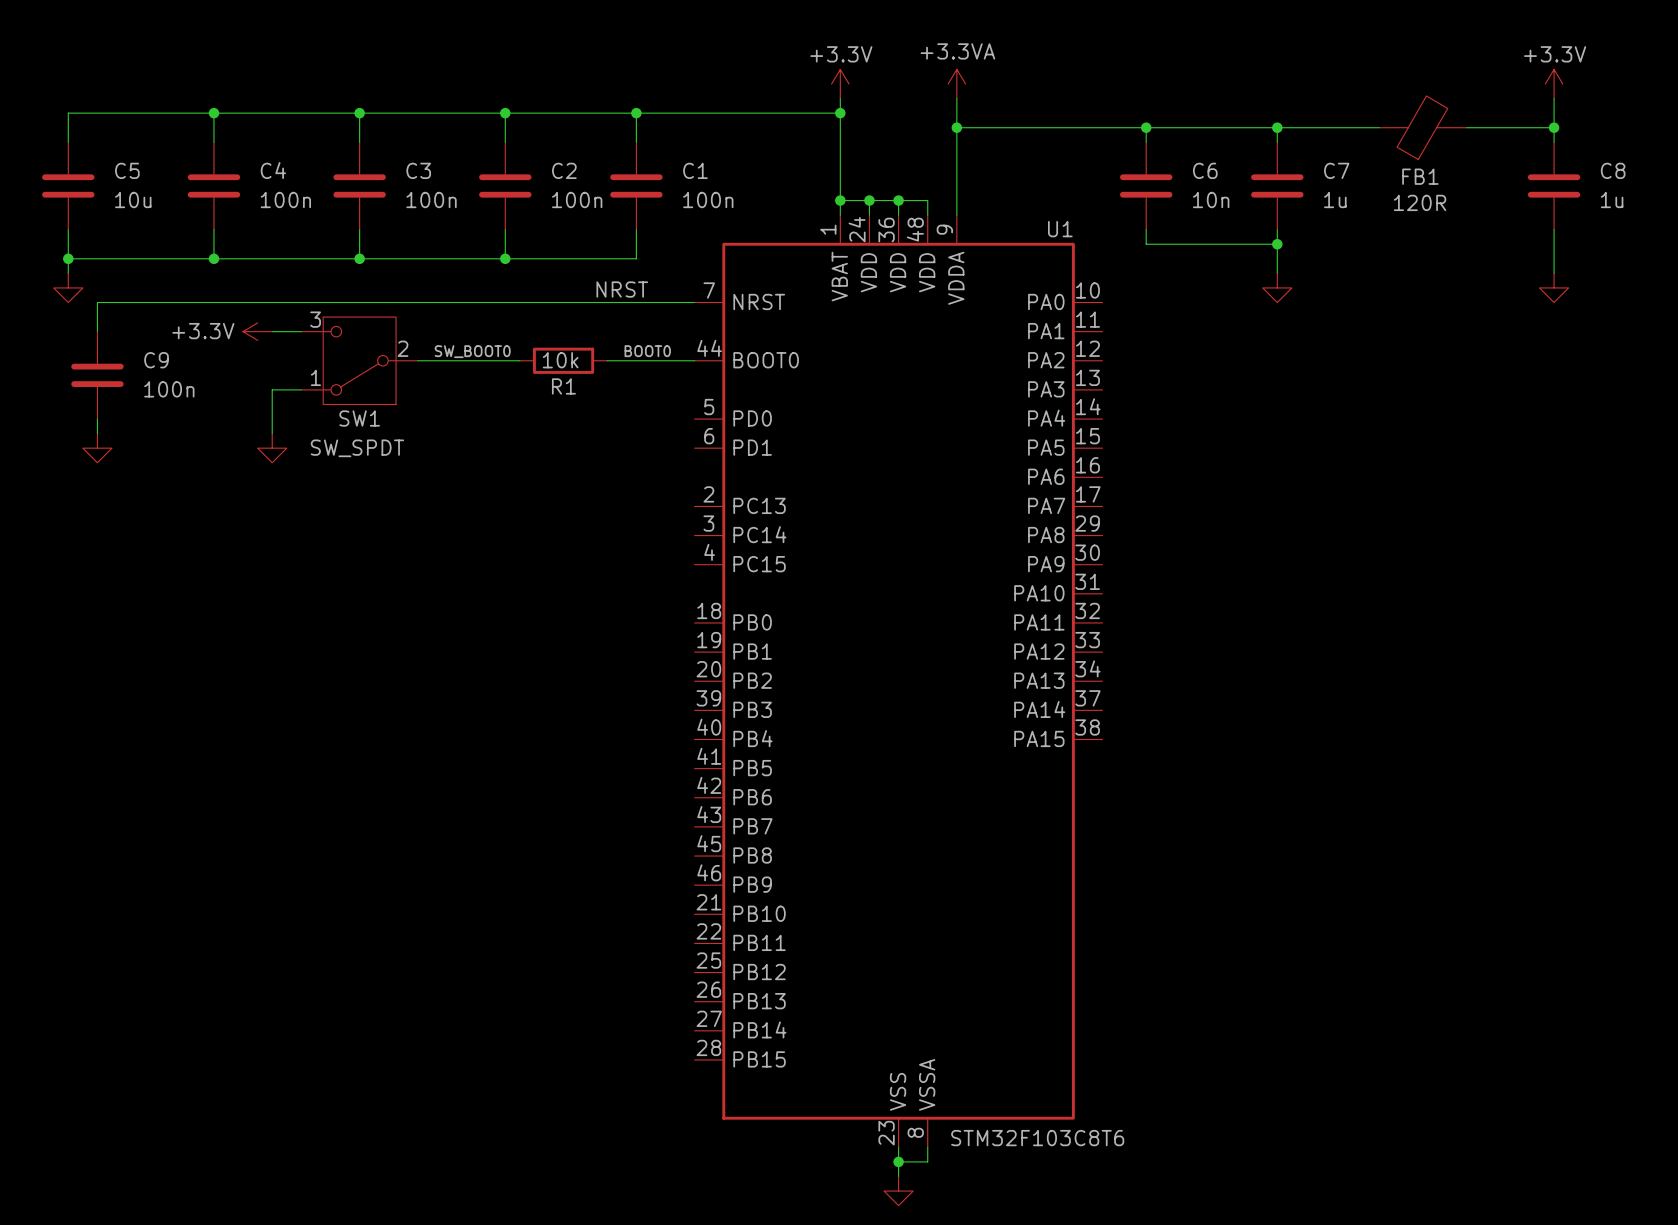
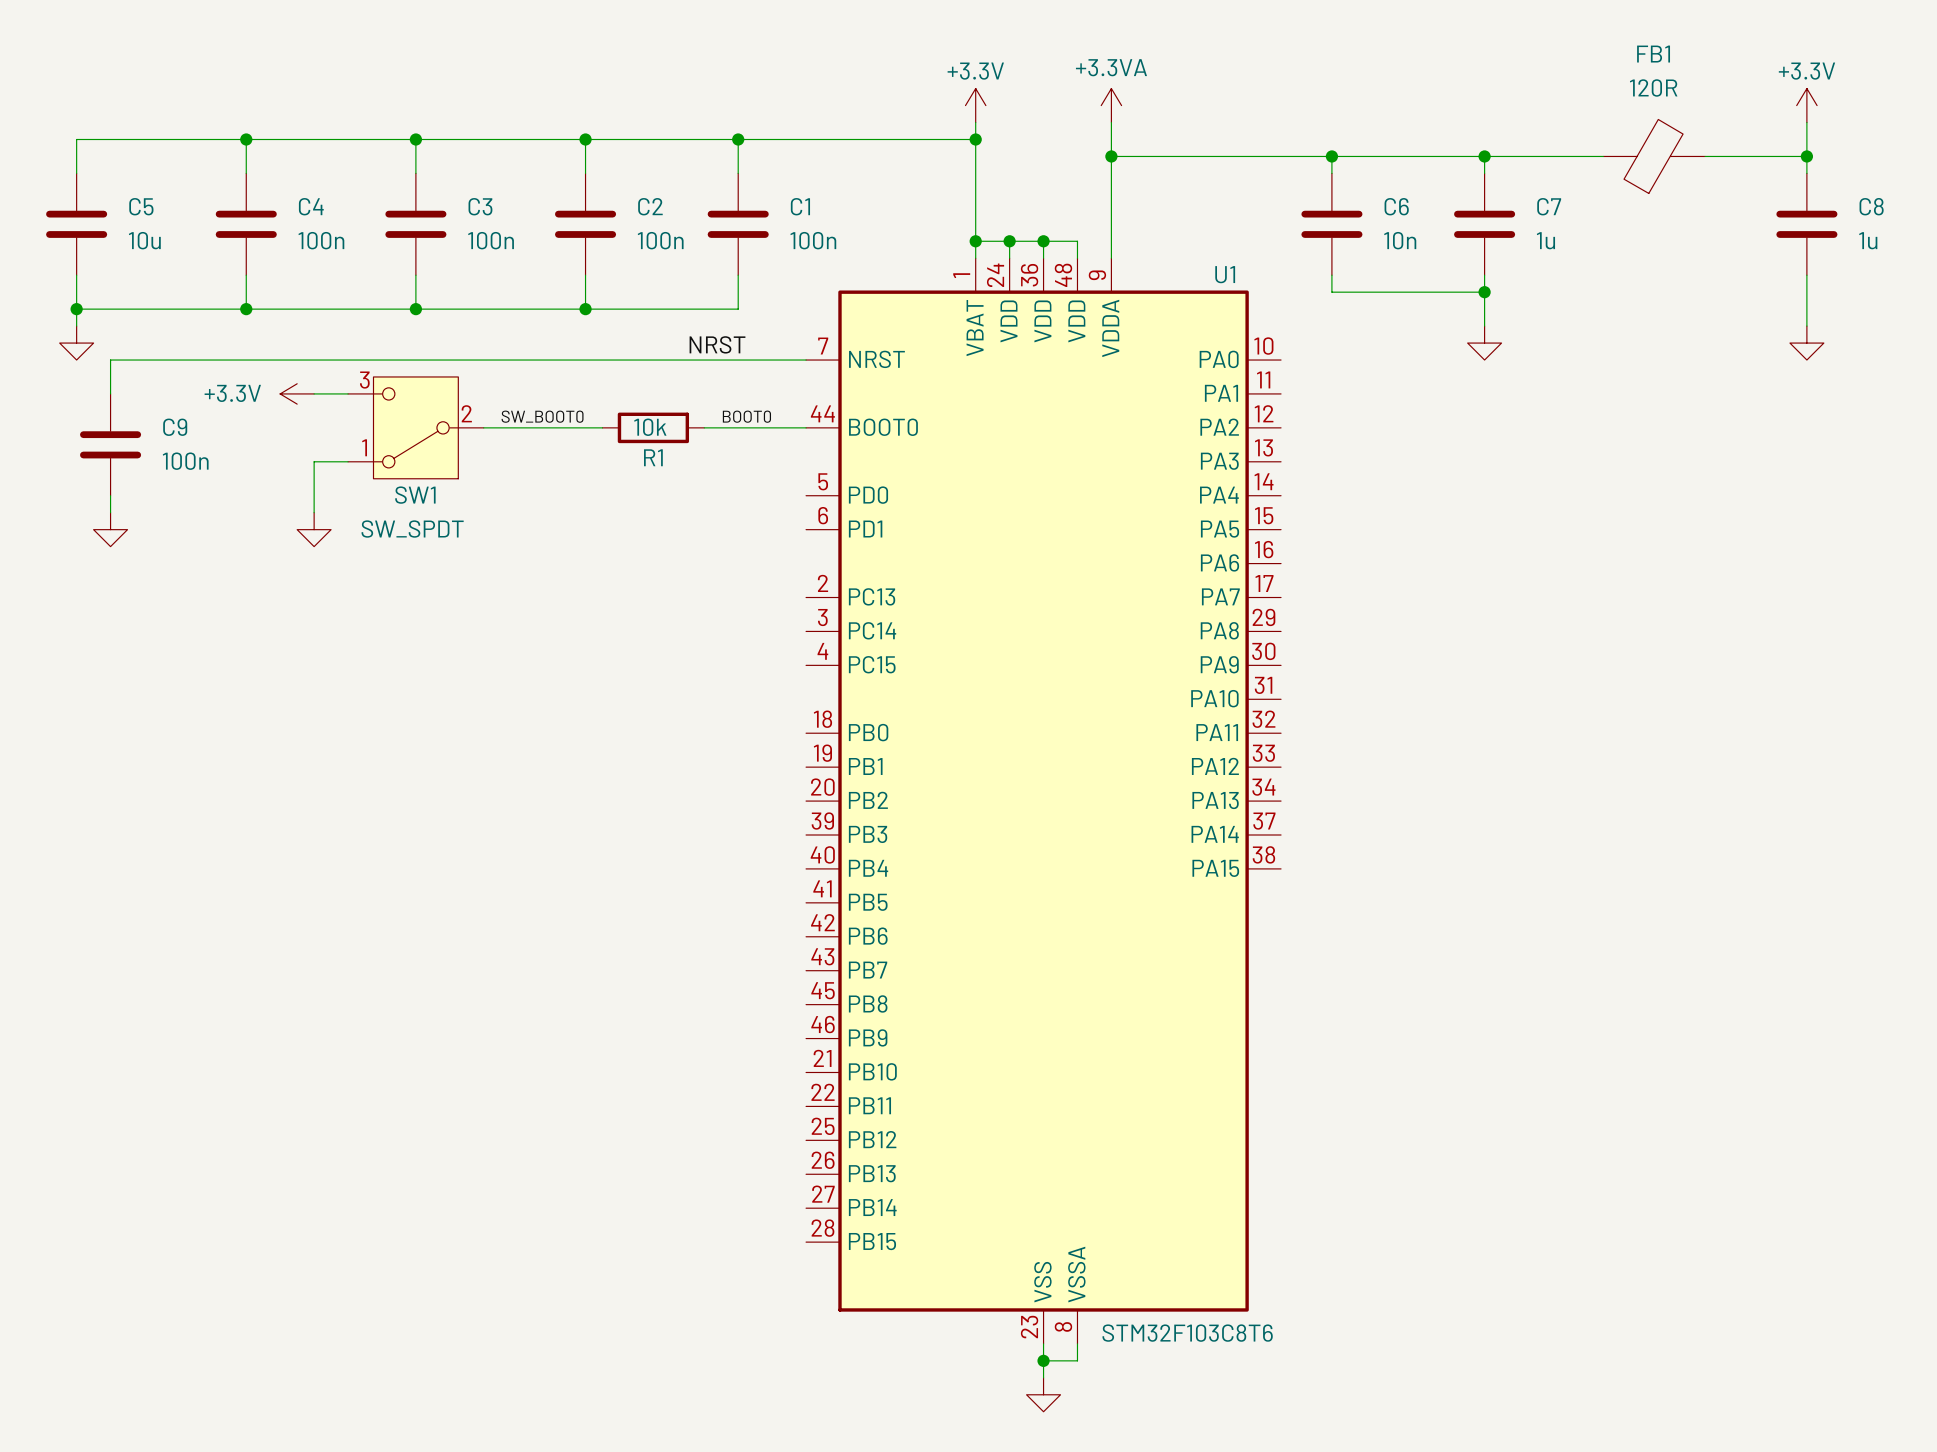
FB1 name position: FB1 (1420, 176) -> FB1 (1653, 54)
FB1 value position: 120R (1420, 202) -> 120R (1653, 87)

